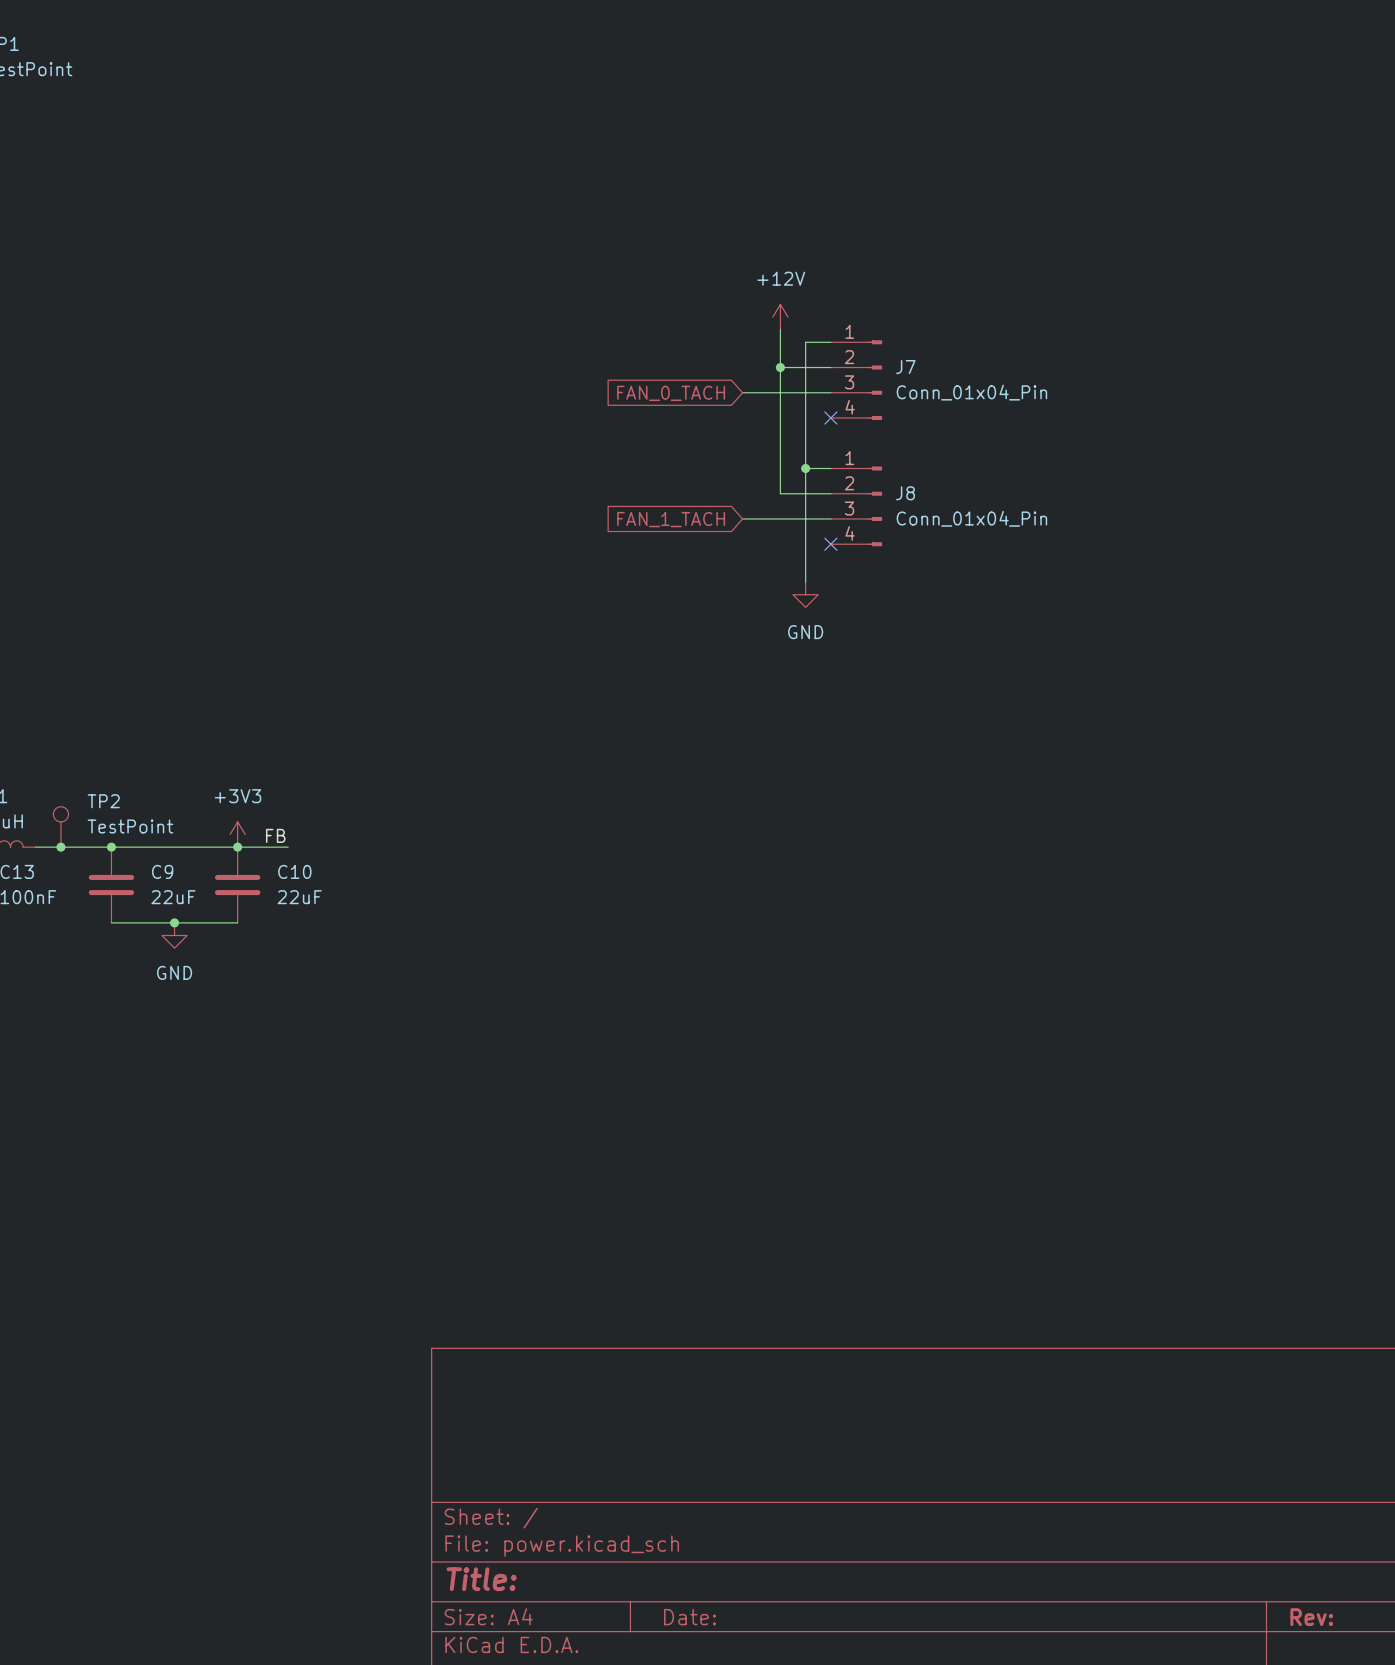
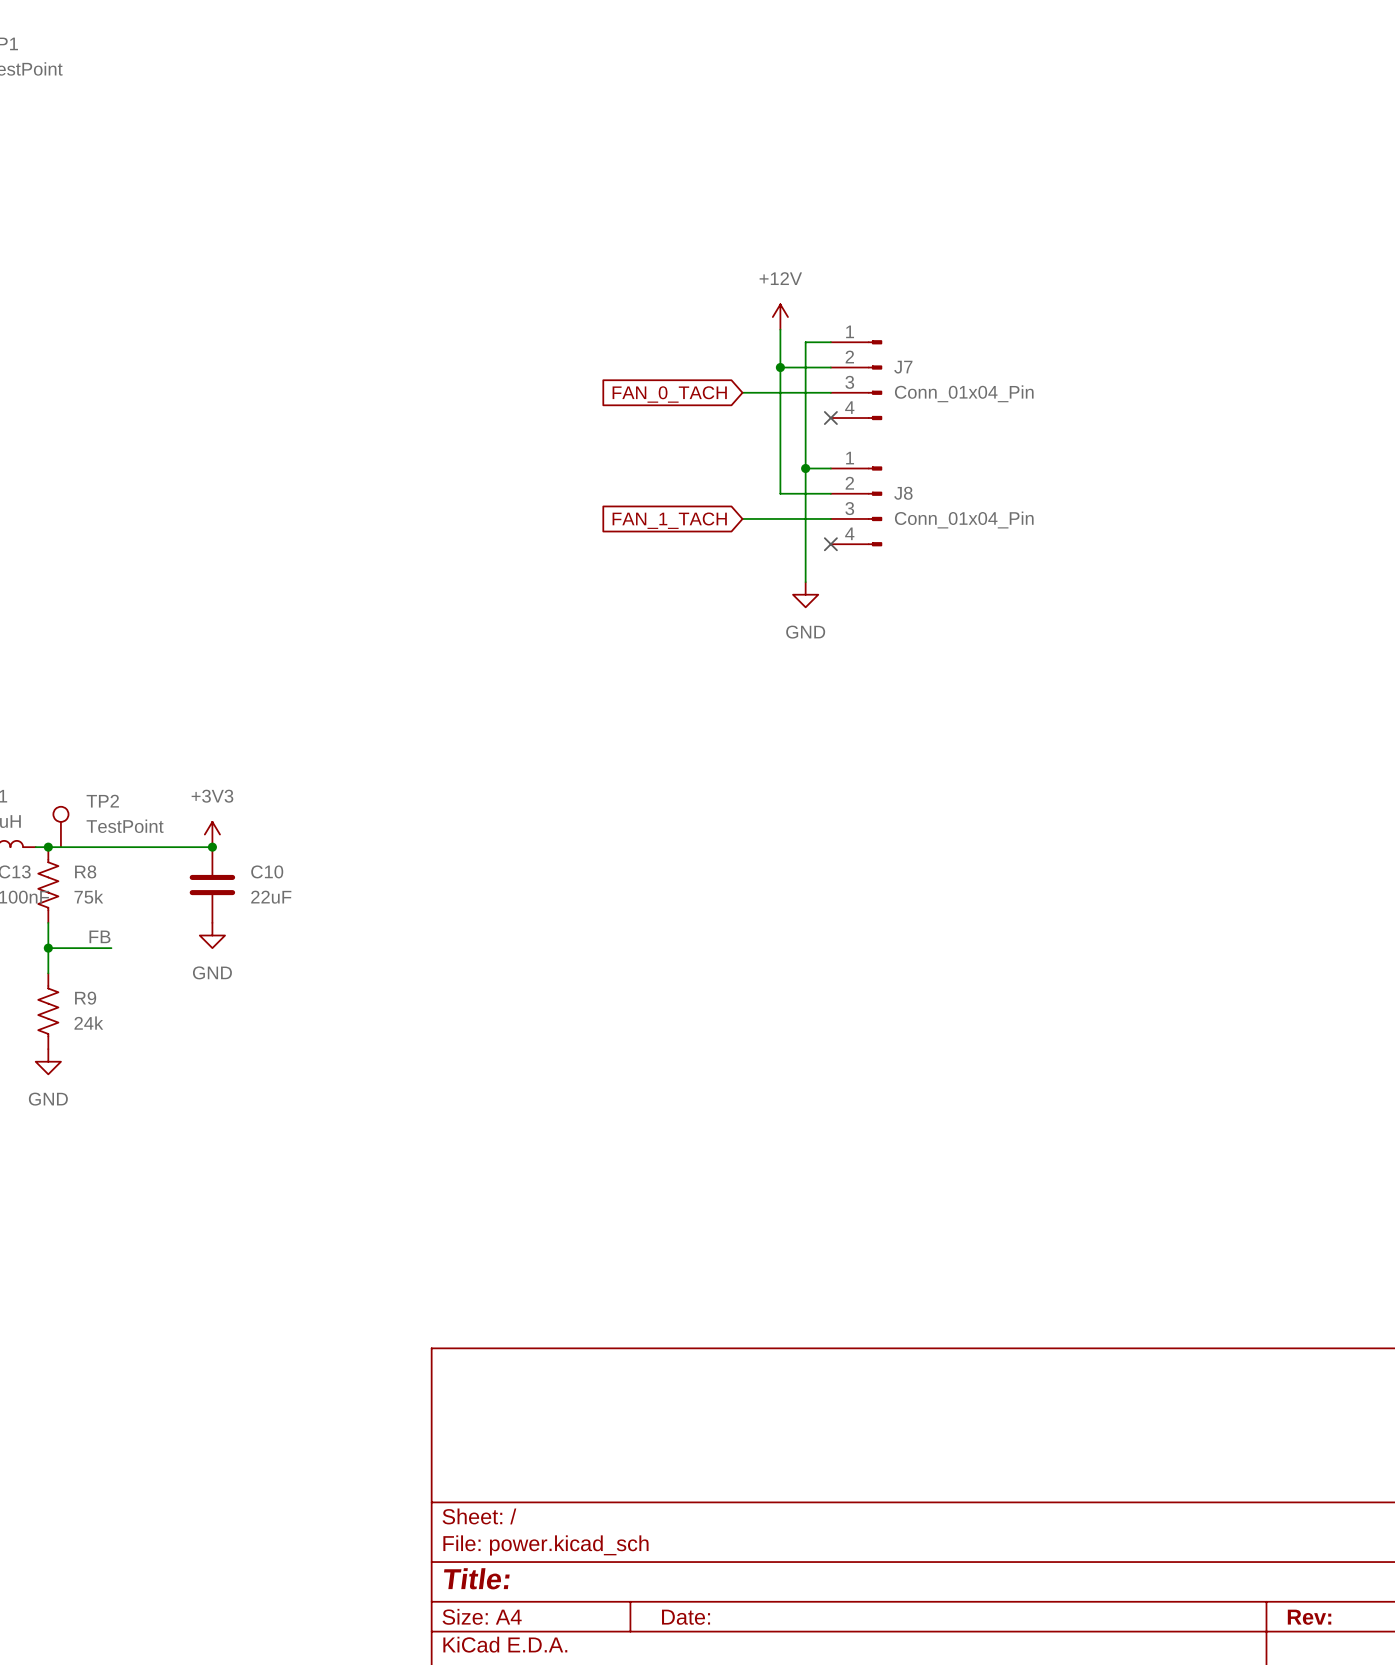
power symbol position: +3V3 (237, 834) -> +3V3 (212, 834)
label: FB (275, 835) -> none
junction position: (60, 847) -> (48, 847)
junction: (111, 847) -> none
wire: (212, 847) (288, 847) -> none
junction position: (237, 847) -> (212, 847)
R8: none -> 75k (48, 885)
C9: 22uF (111, 885) -> none
C10 position: (237, 885) -> (212, 885)
wire: none -> (48, 922) (48, 973)
wire: (111, 922) (237, 922) -> none
junction: (174, 922) -> none
power symbol position: GND (174, 935) -> GND (212, 935)
label: none -> FB (99, 936)
wire: none -> (48, 948) (111, 948)
junction: none -> (48, 948)
R9: none -> 24k (48, 1011)
power symbol: none -> GND (48, 1061)

